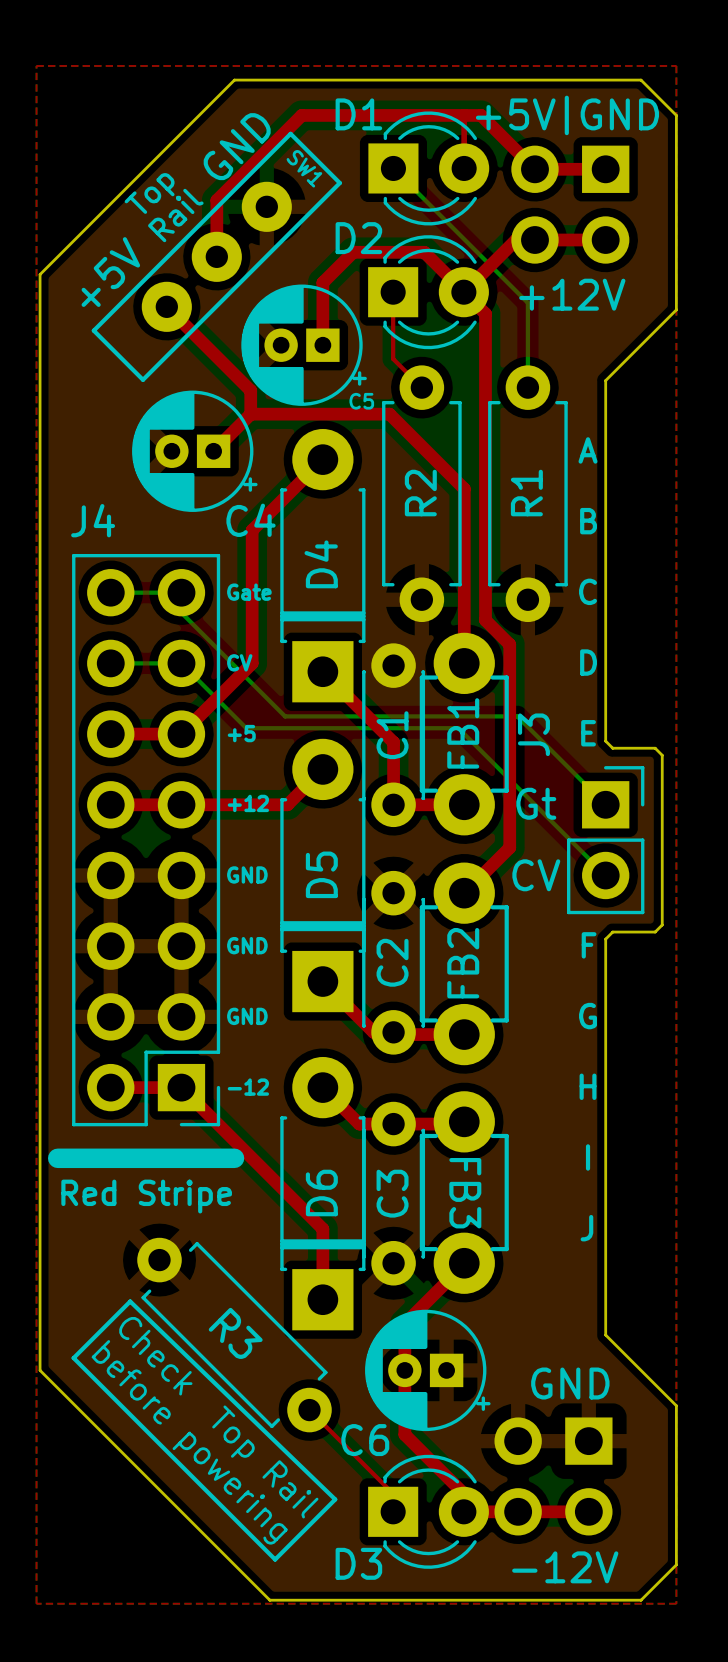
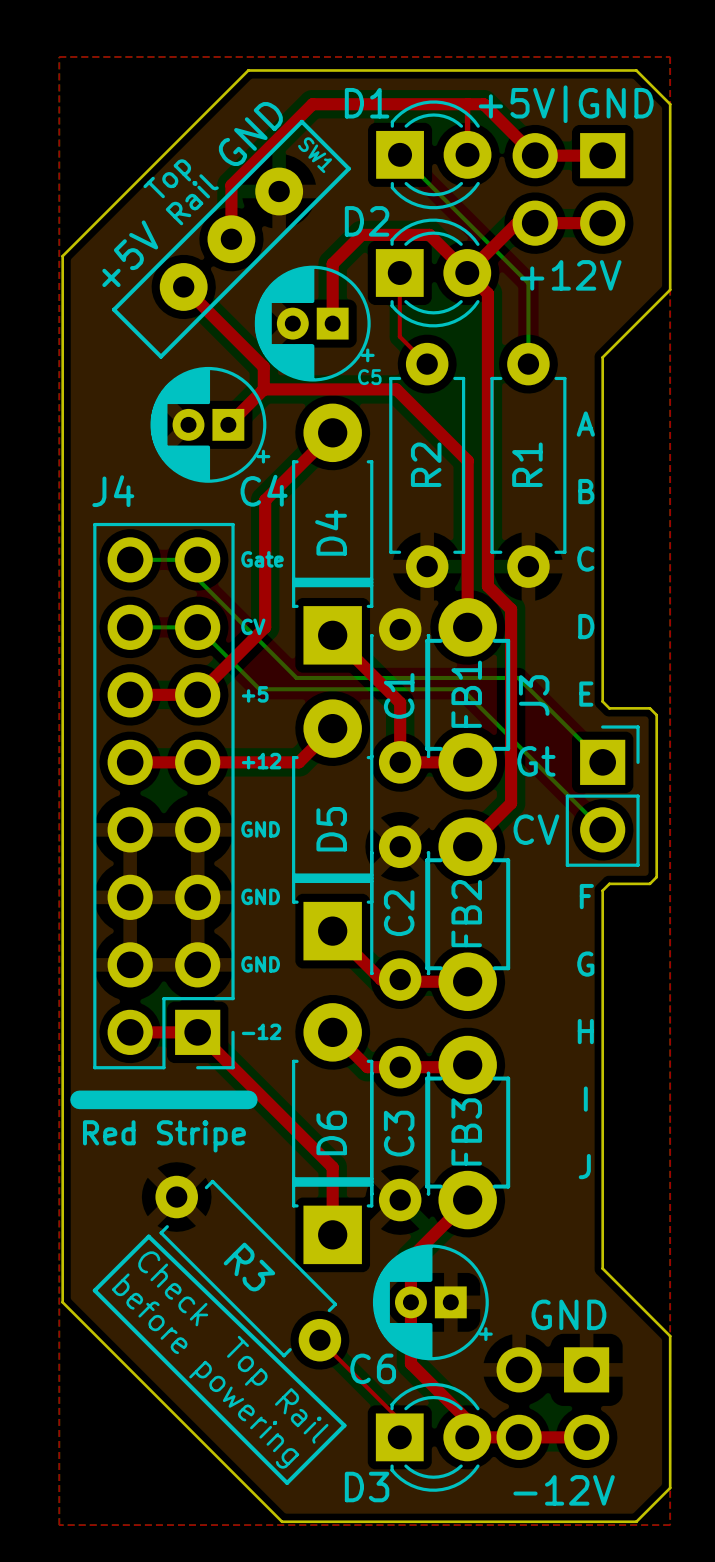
FB3 name rotation: 0° (465, 1193) -> 180° (466, 1131)

